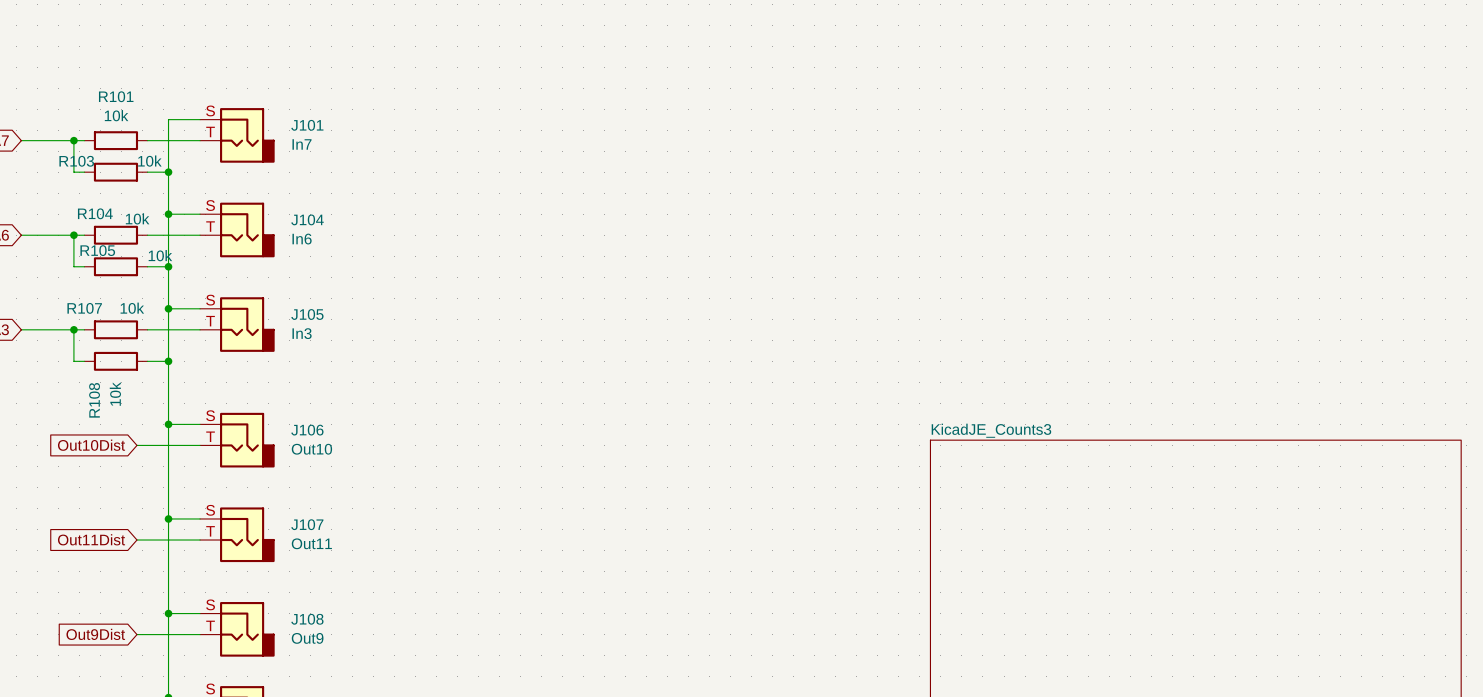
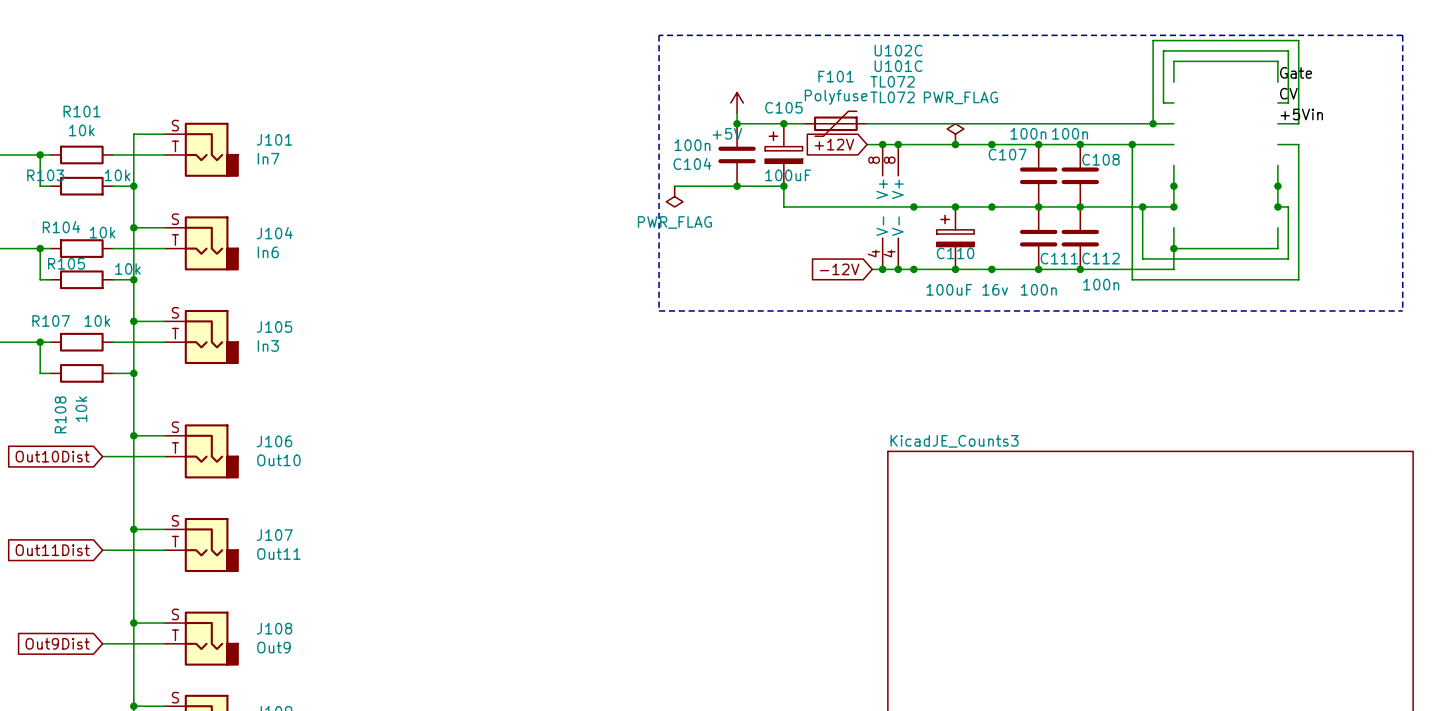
line: none -> (659, 35) (1402, 35) (1402, 310) (659, 310) (659, 35)
label: none -> Gate (1296, 72)
wire: none -> (1173, 82) (1173, 61) (1277, 61) (1277, 82)
label: none -> CV (1288, 93)
power symbol: none -> +5V (737, 102)
wire: none -> (1173, 102) (1163, 102) (1163, 50) (1288, 50) (1288, 102) (1277, 102)
wire: none -> (737, 113) (737, 123) (804, 123)
label: none -> +5Vin (1301, 114)
junction: none -> (737, 123)
junction: none -> (783, 123)
F101: none -> Polyfuse (835, 123)
wire: none -> (867, 123) (1173, 123)
wire: none -> (1153, 123) (1153, 40) (1298, 40) (1298, 123) (1277, 123)
junction: none -> (1153, 123)
power symbol: none -> PWR_FLAG (955, 134)
global label: none -> +12V (834, 144)
wire: none -> (867, 144) (1173, 144)
junction: none -> (882, 144)
junction: none -> (898, 144)
junction: none -> (955, 144)
junction: none -> (991, 144)
junction: none -> (1038, 144)
junction: none -> (1080, 144)
wire: none -> (1132, 144) (1132, 279) (1298, 279) (1298, 144) (1277, 144)
junction: none -> (1132, 144)
C104: none -> 100n (737, 154)
C105: none -> 100uF (783, 154)
wire: none -> (1173, 165) (1173, 206) (783, 206) (783, 186) (674, 186)
wire: none -> (1277, 165) (1277, 206) (1288, 206) (1288, 258) (1142, 258) (1142, 206)
C107: none -> 100n (1038, 175)
C108: none -> 100n (1080, 175)
junction: none -> (737, 186)
junction: none -> (783, 186)
junction: none -> (1173, 186)
junction: none -> (1277, 186)
power symbol: none -> PWR_FLAG (674, 196)
U101C: none -> TL072 (882, 206)
U102C: none -> TL072 (898, 206)
junction: none -> (913, 206)
junction: none -> (955, 206)
junction: none -> (991, 206)
junction: none -> (1038, 206)
junction: none -> (1080, 206)
junction: none -> (1142, 206)
junction: none -> (1173, 206)
junction: none -> (1277, 206)
wire: none -> (1173, 227) (1173, 269) (872, 269)
wire: none -> (1277, 227) (1277, 248) (1173, 248)
C110: none -> 100uF 16v (955, 238)
C111: none -> 100n (1038, 238)
C112: none -> 100n (1080, 238)
junction: none -> (1173, 248)
global label: none -> -12V (839, 269)
junction: none -> (882, 269)
junction: none -> (898, 269)
junction: none -> (913, 269)
junction: none -> (955, 269)
junction: none -> (991, 269)
junction: none -> (1038, 269)
junction: none -> (1080, 269)

